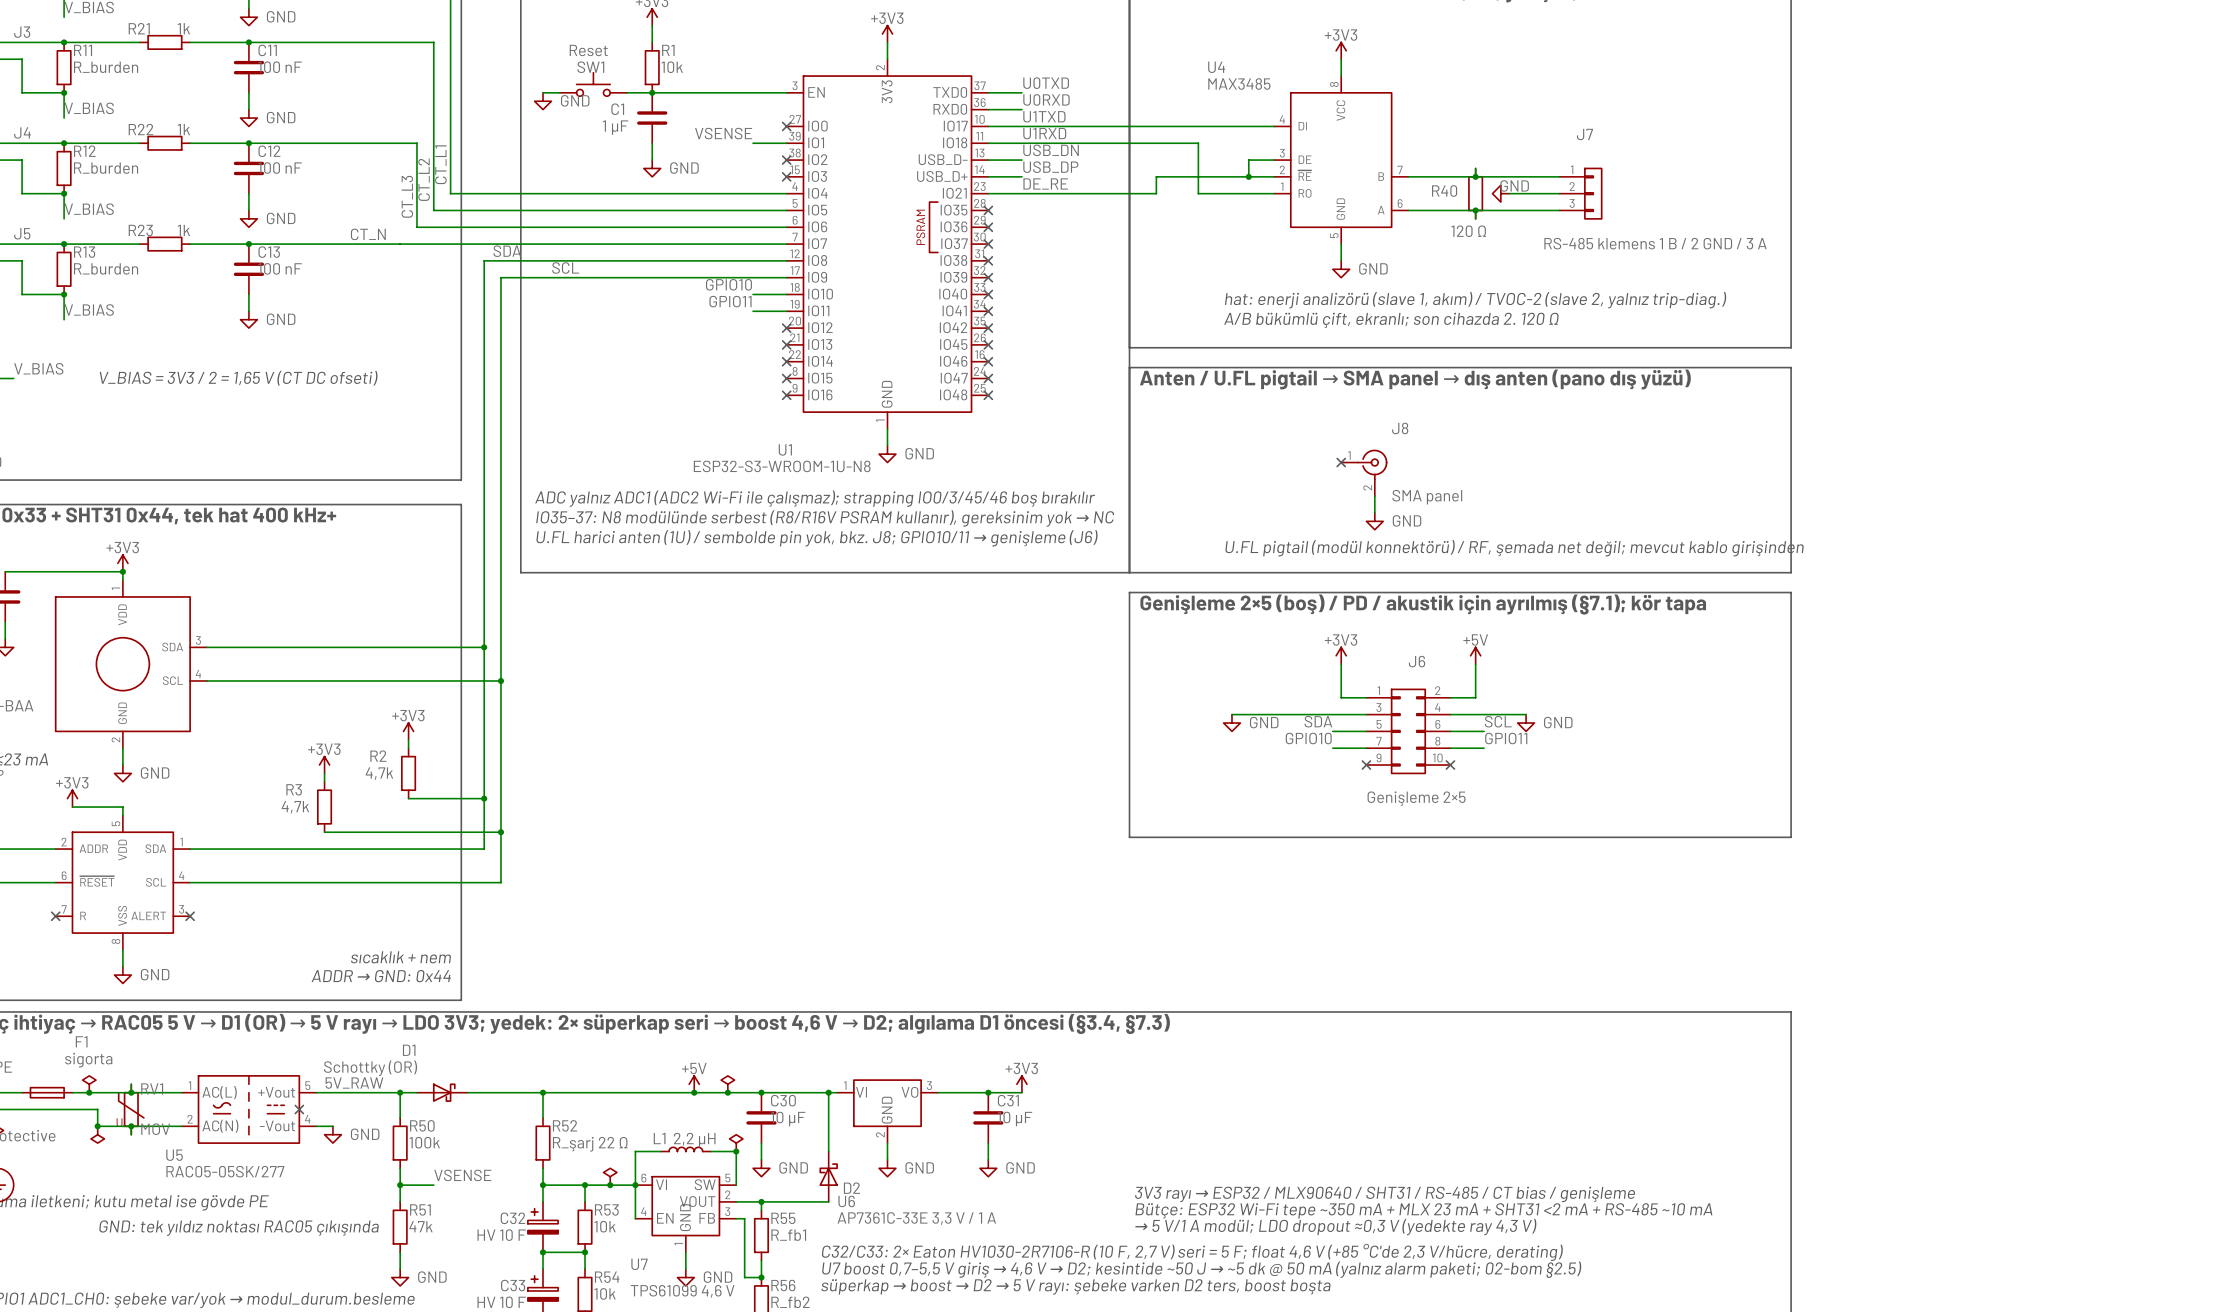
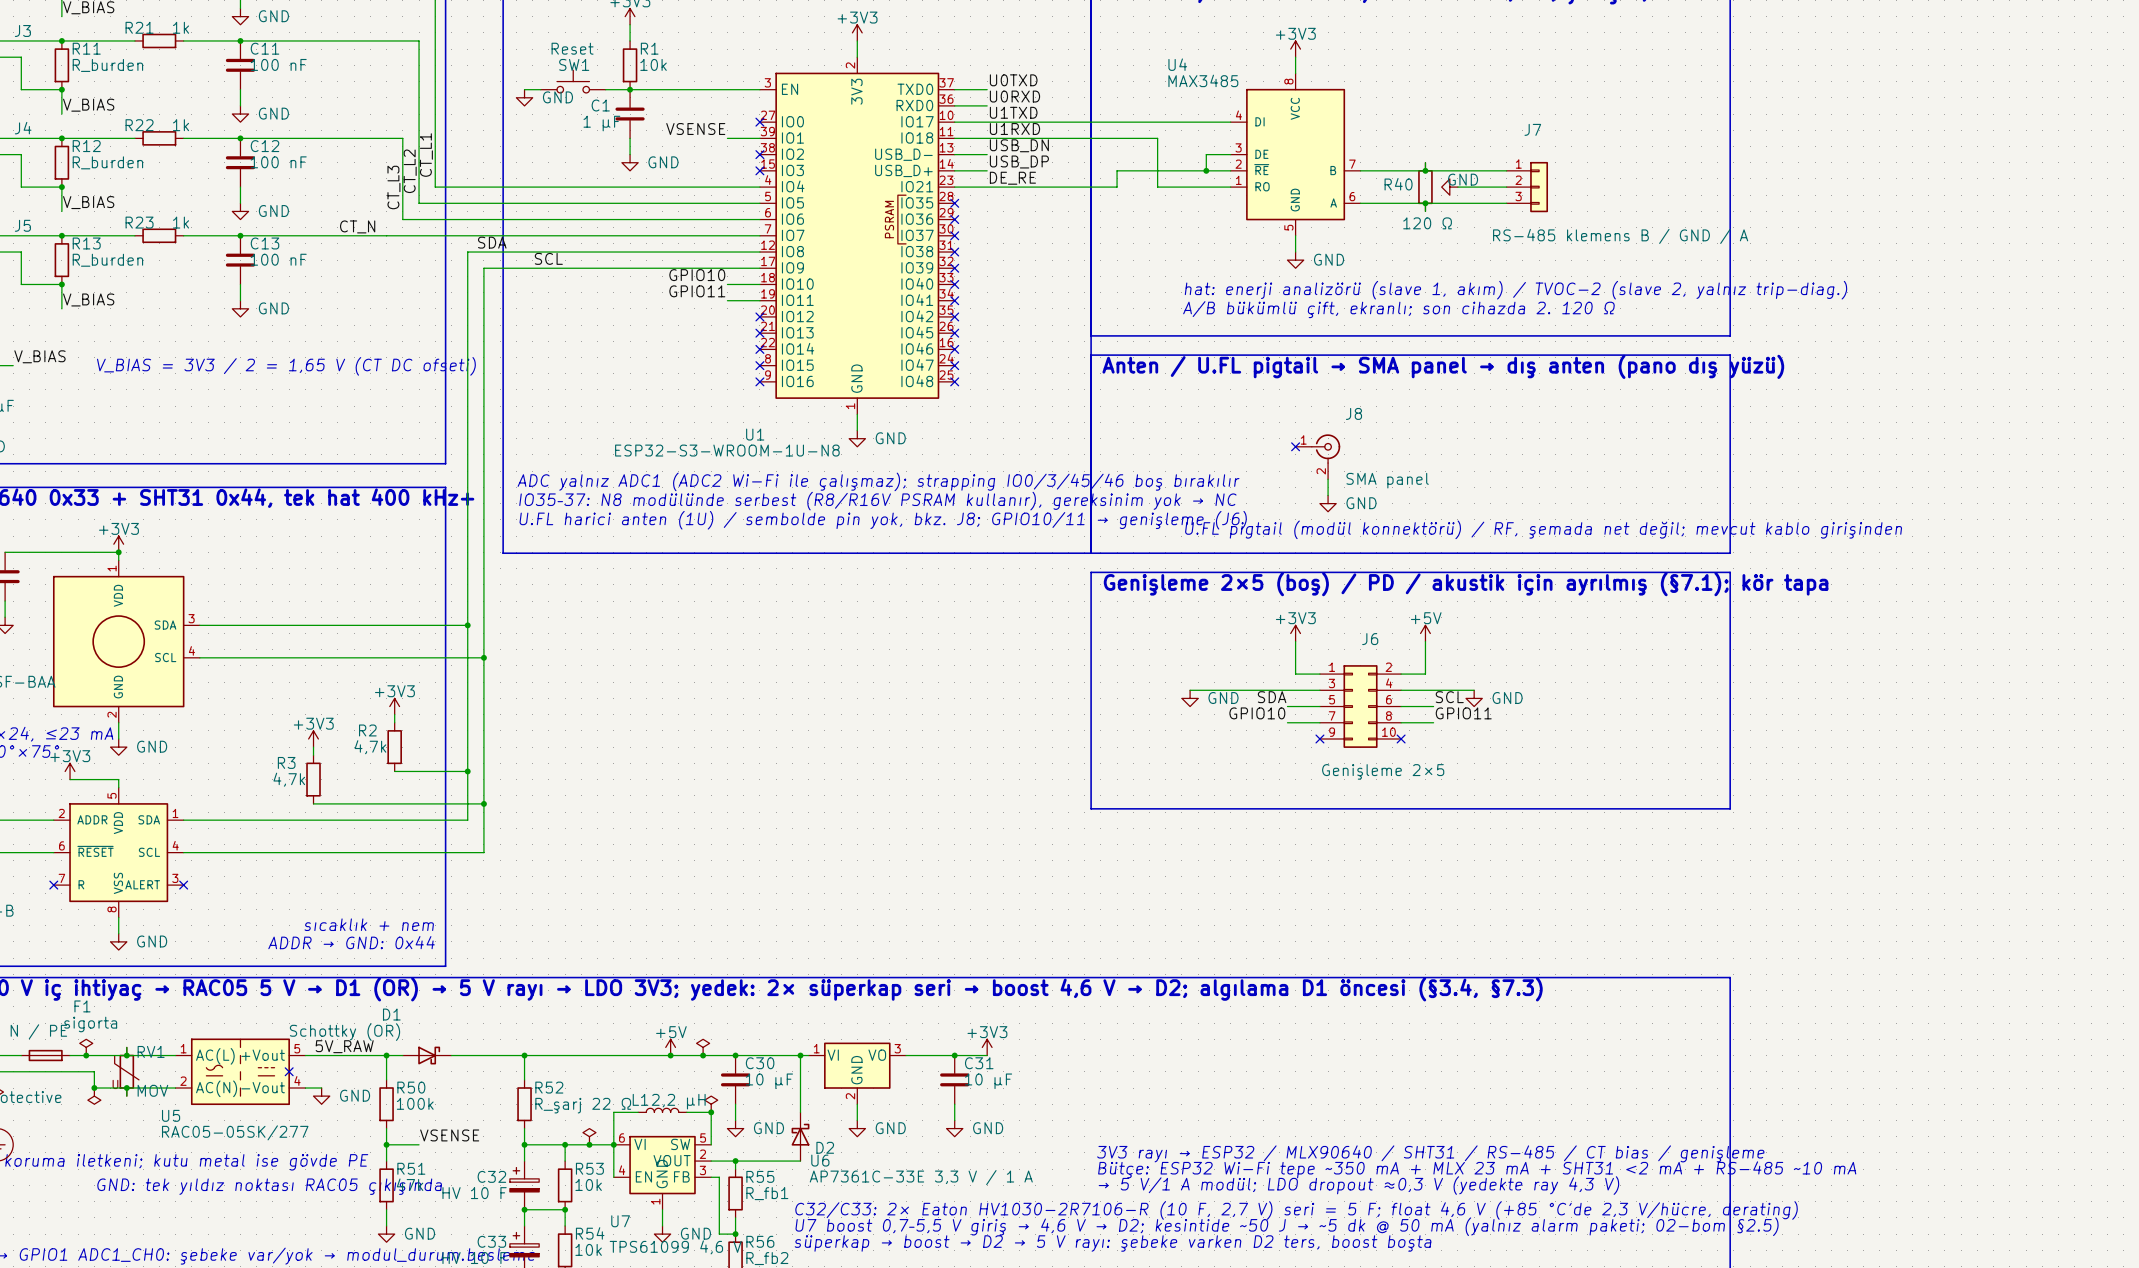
J7 value: RS-485 klemens 1 B / 2 GND / 3 A (1655, 243) -> RS-485 klemens B / GND / A (1620, 236)

